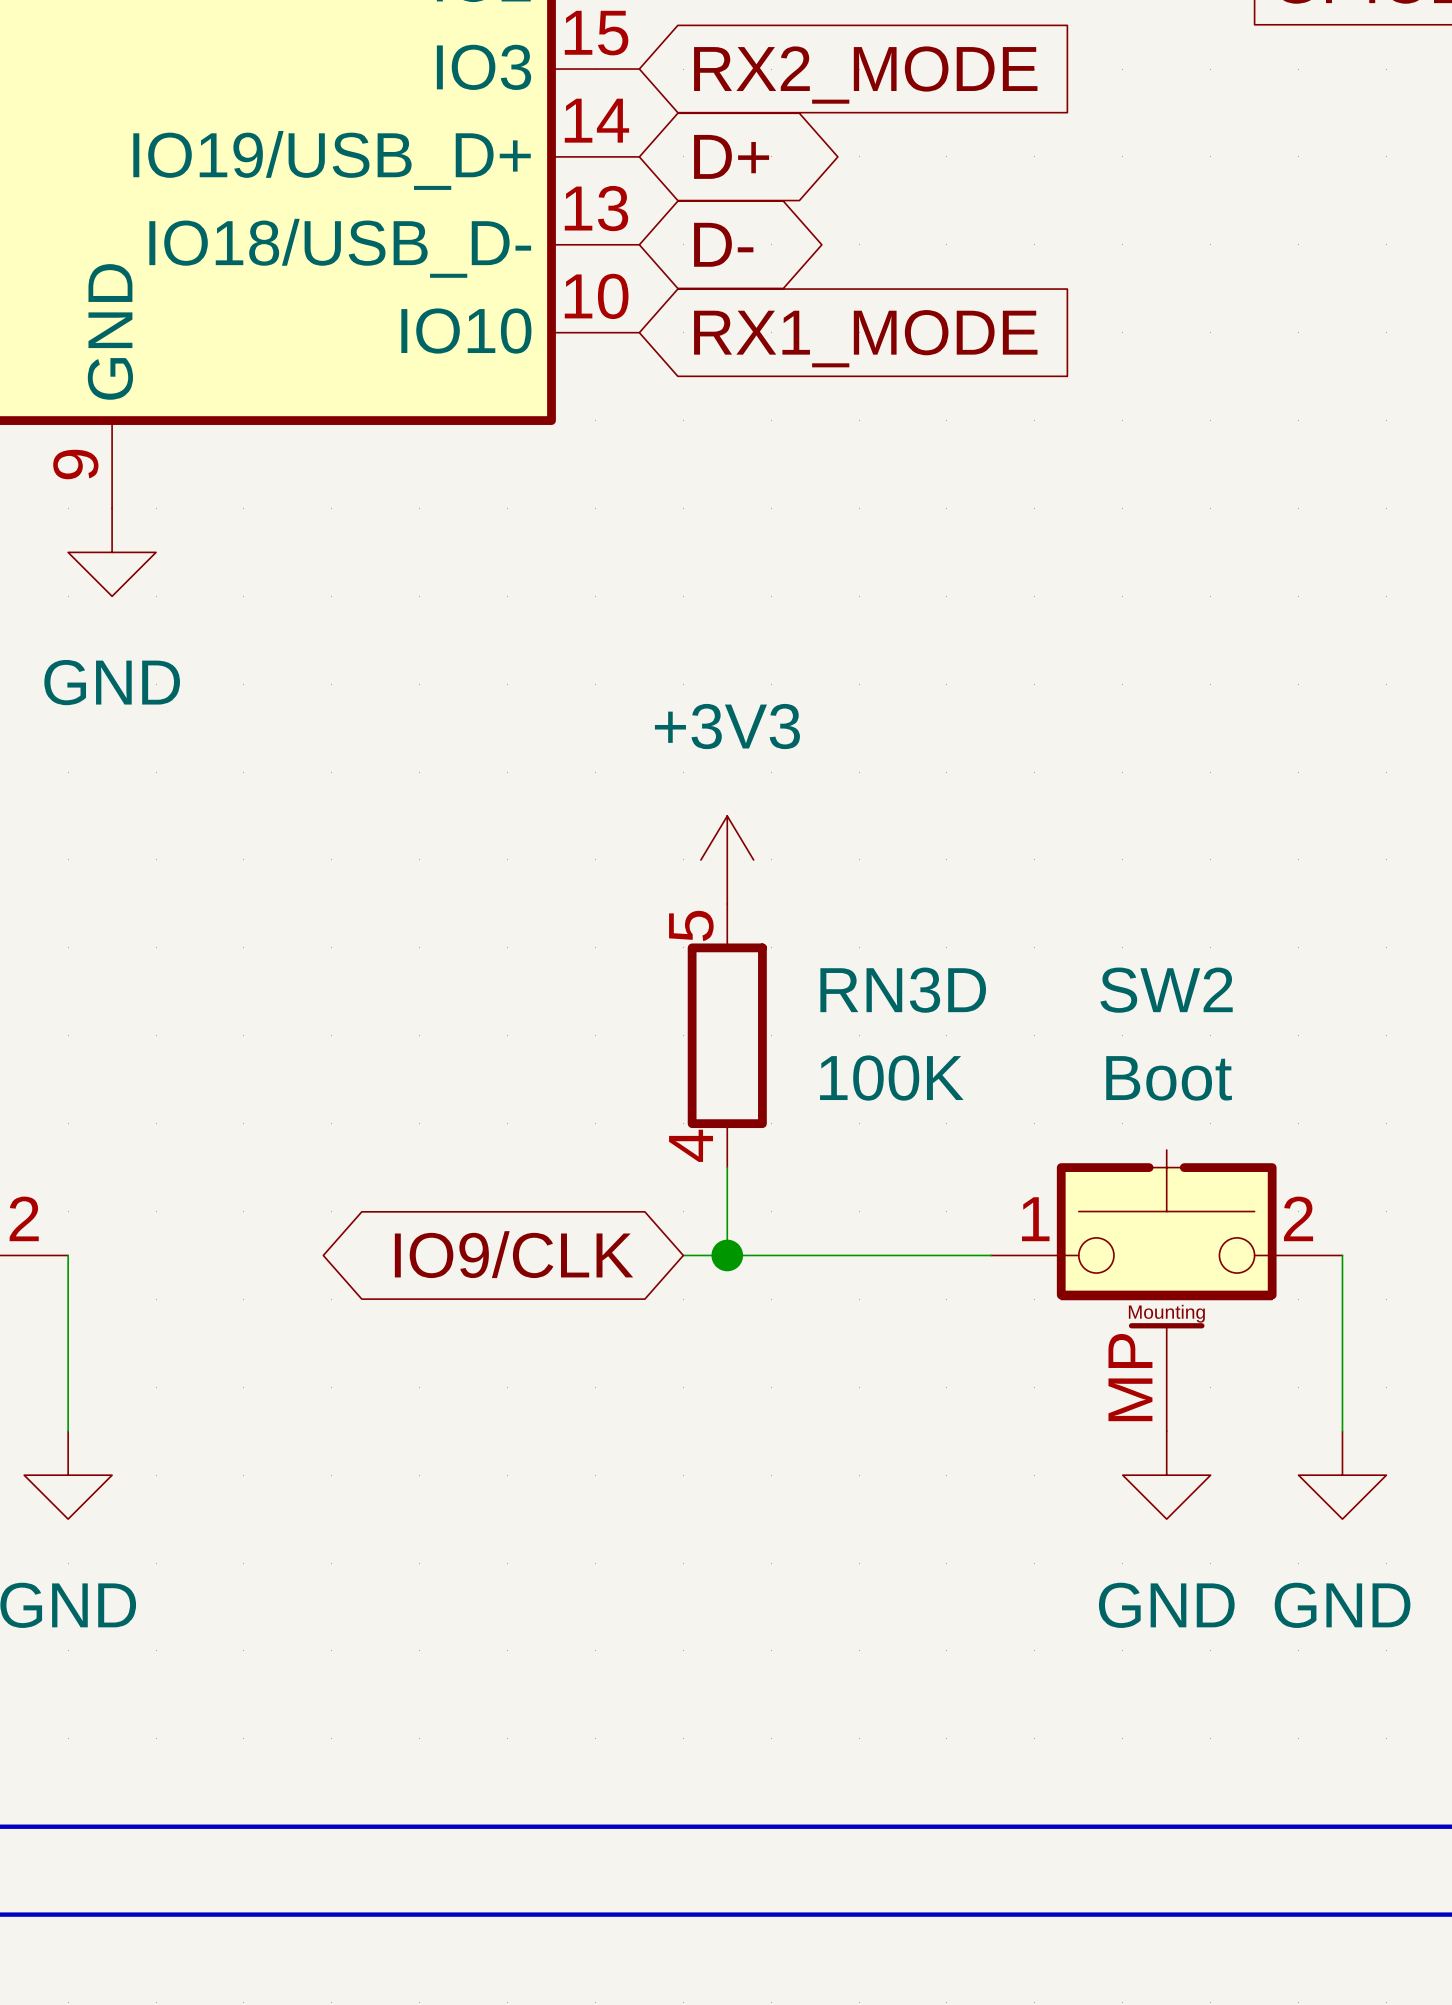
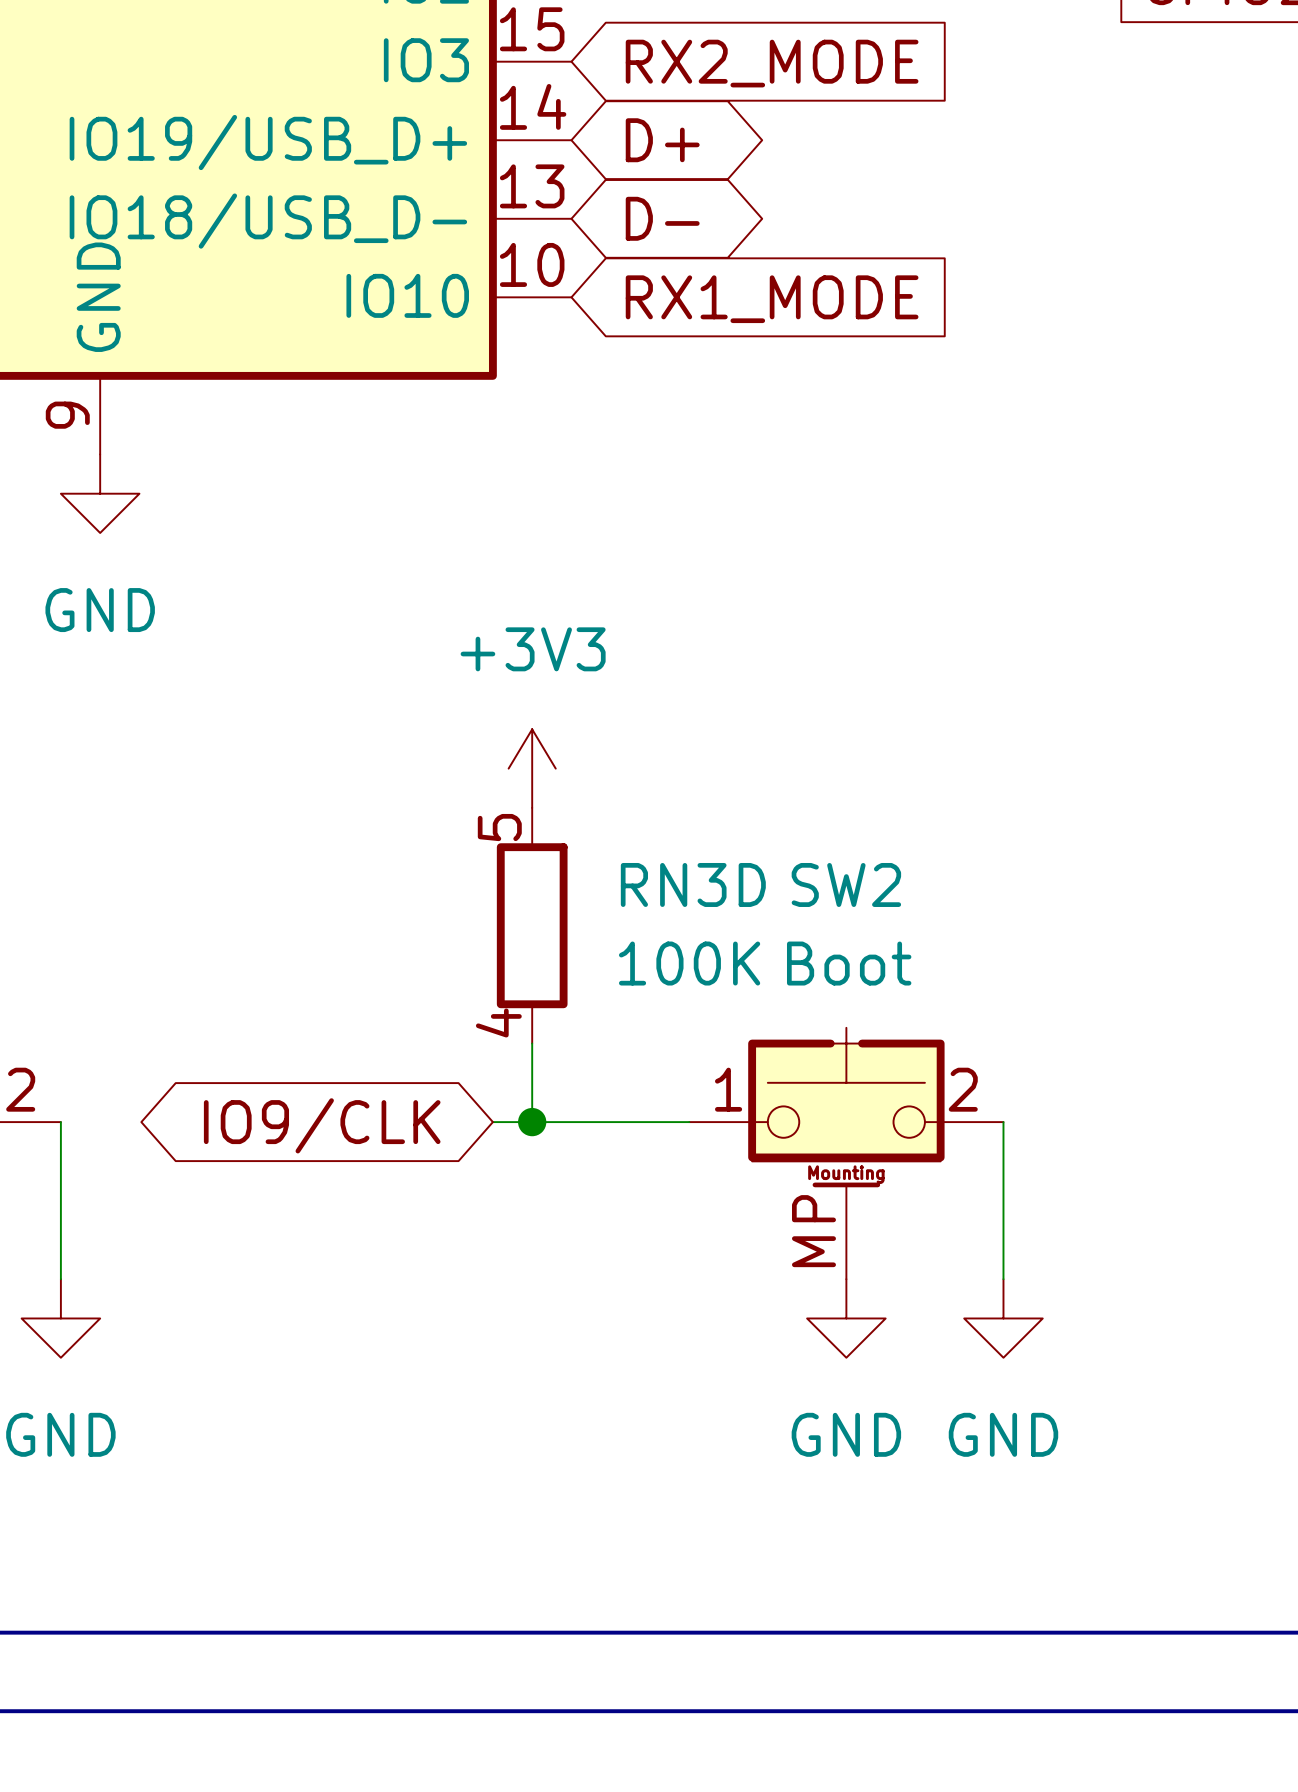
power symbol position: +3V3 (727, 859) -> +3V3 (532, 768)
RN3D position: (727, 1035) -> (532, 925)
wire: (727, 1167) (727, 1255) -> (532, 1043) (532, 1122)
global label position: IO9/CLK (514, 1254) -> IO9/CLK (322, 1125)
wire: none -> (492, 1122) (610, 1122)
junction position: (727, 1255) -> (532, 1122)
wire: (1342, 1255) (1342, 1431) -> (1003, 1122) (1003, 1279)
SW2 position: (1166, 1290) -> (846, 1153)
power symbol: none -> GND (846, 1318)
power symbol position: GND (1166, 1475) -> GND (1003, 1318)
power symbol: GND (1342, 1475) -> none

